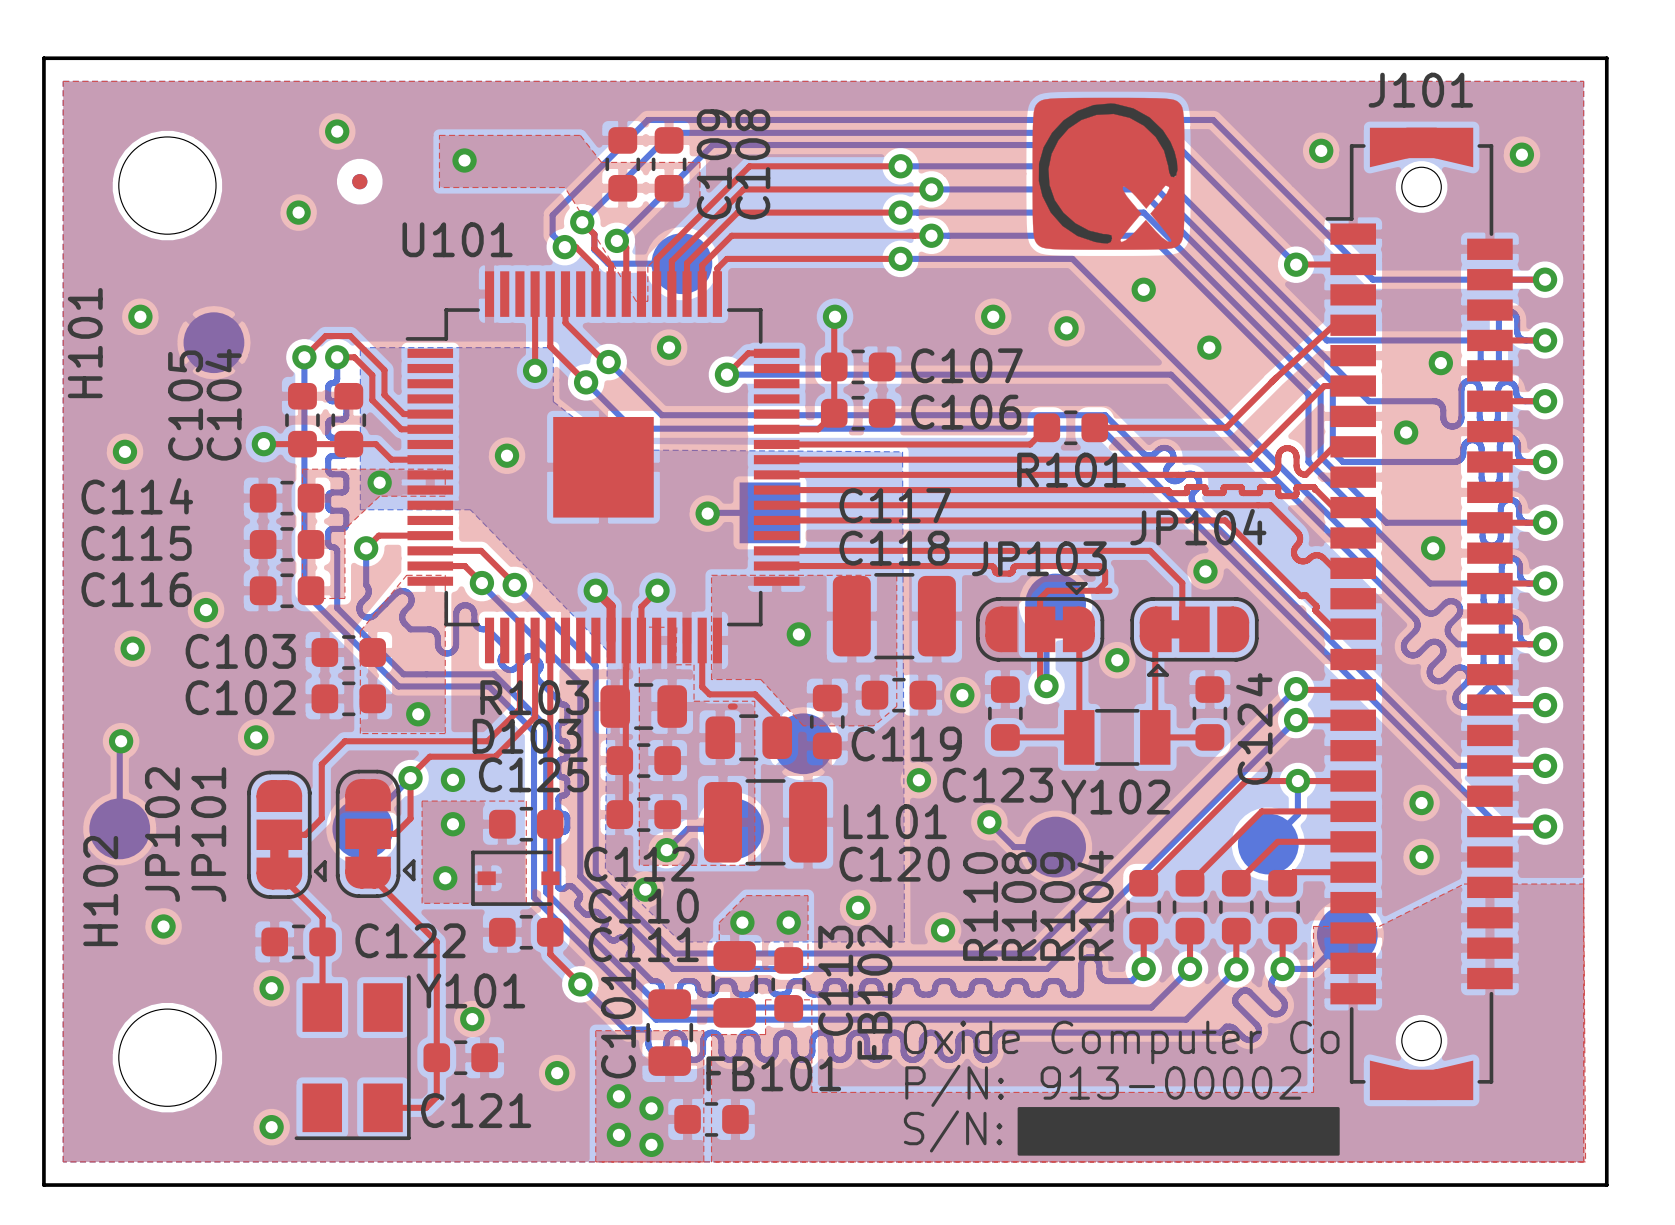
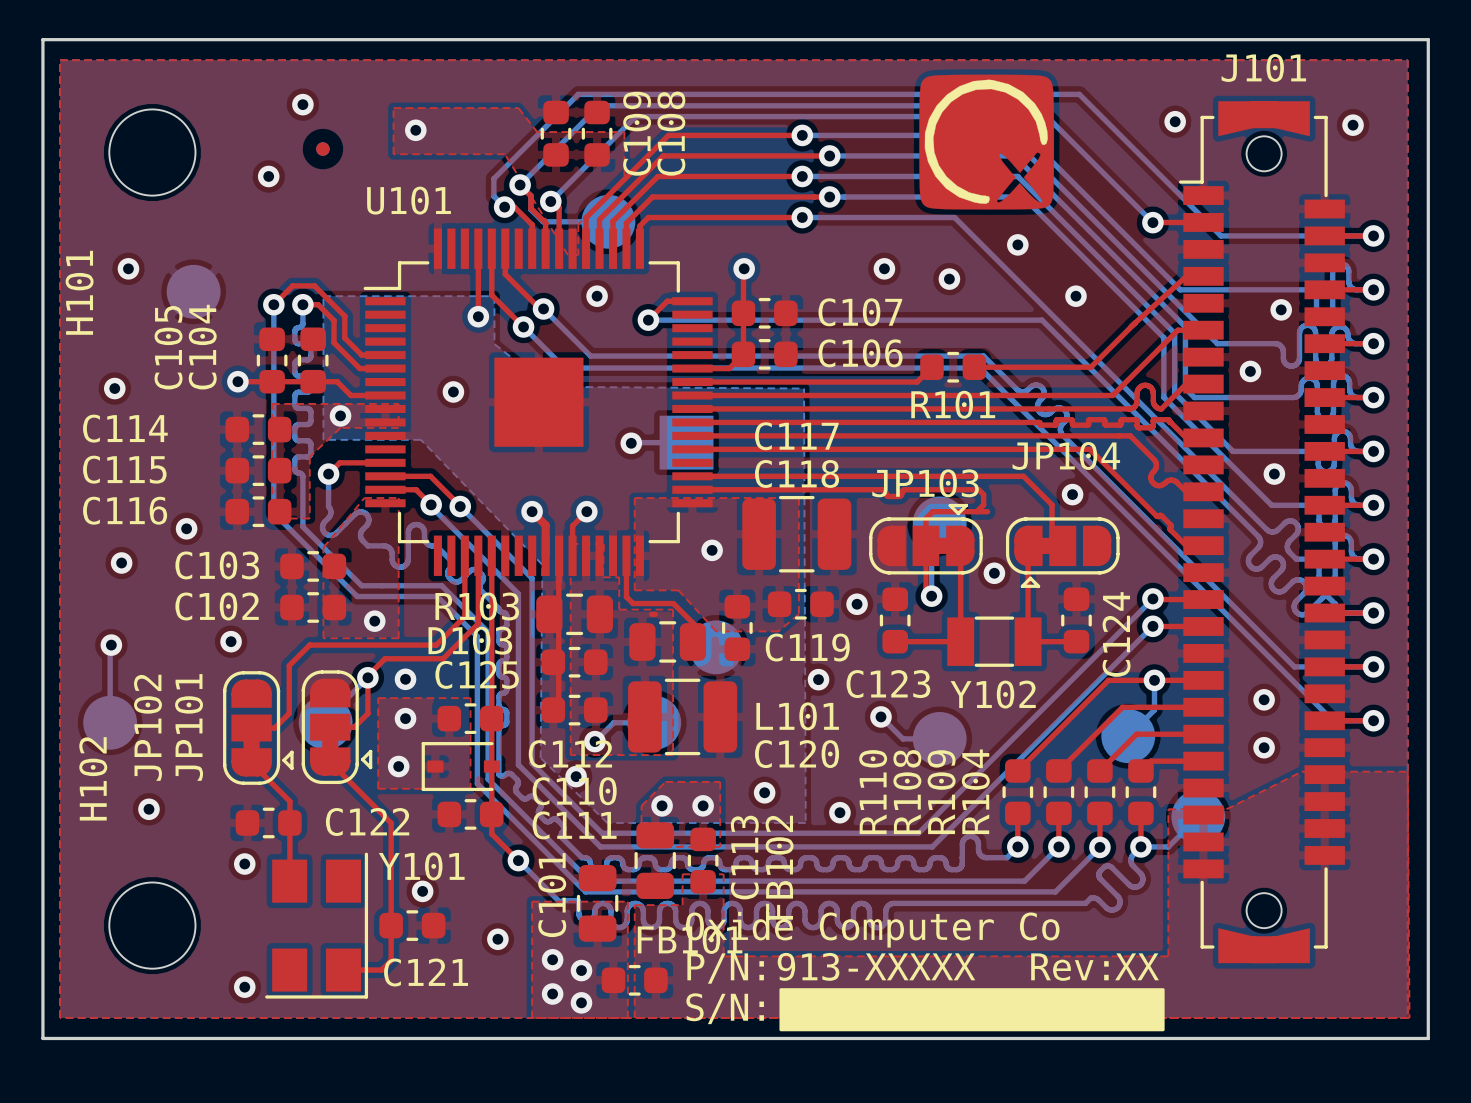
drawing: [1017, 1107, 1340, 1156] -> none
drawing: none -> [779, 988, 1165, 1032]

